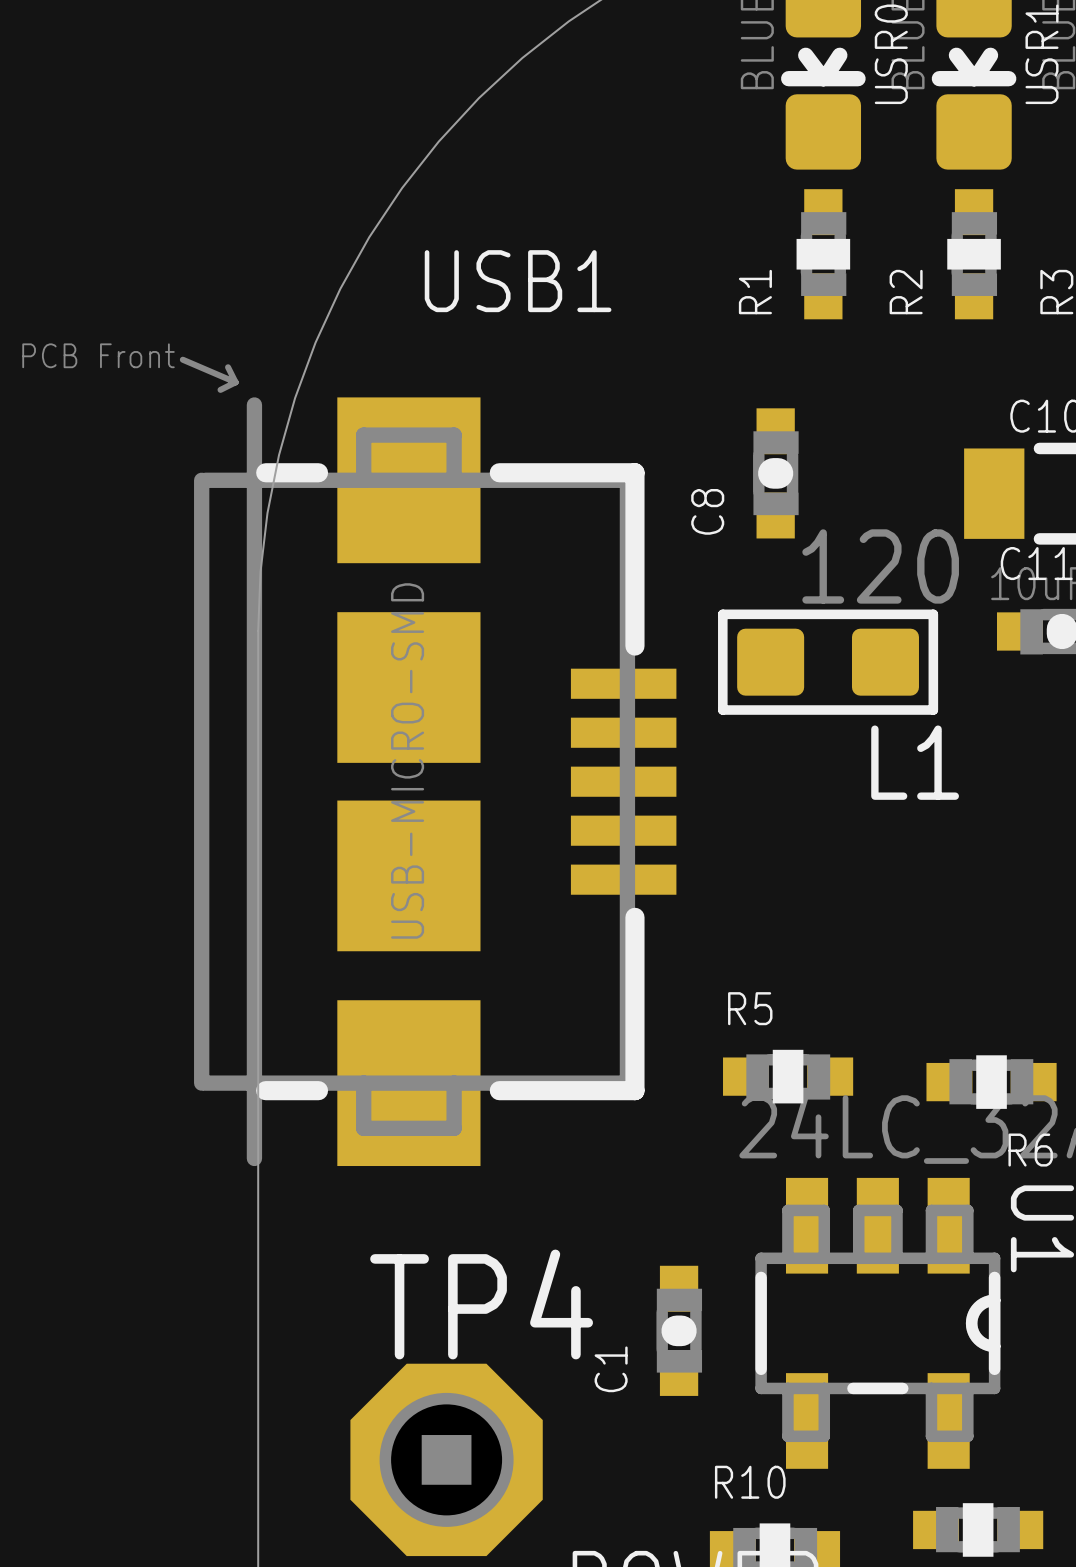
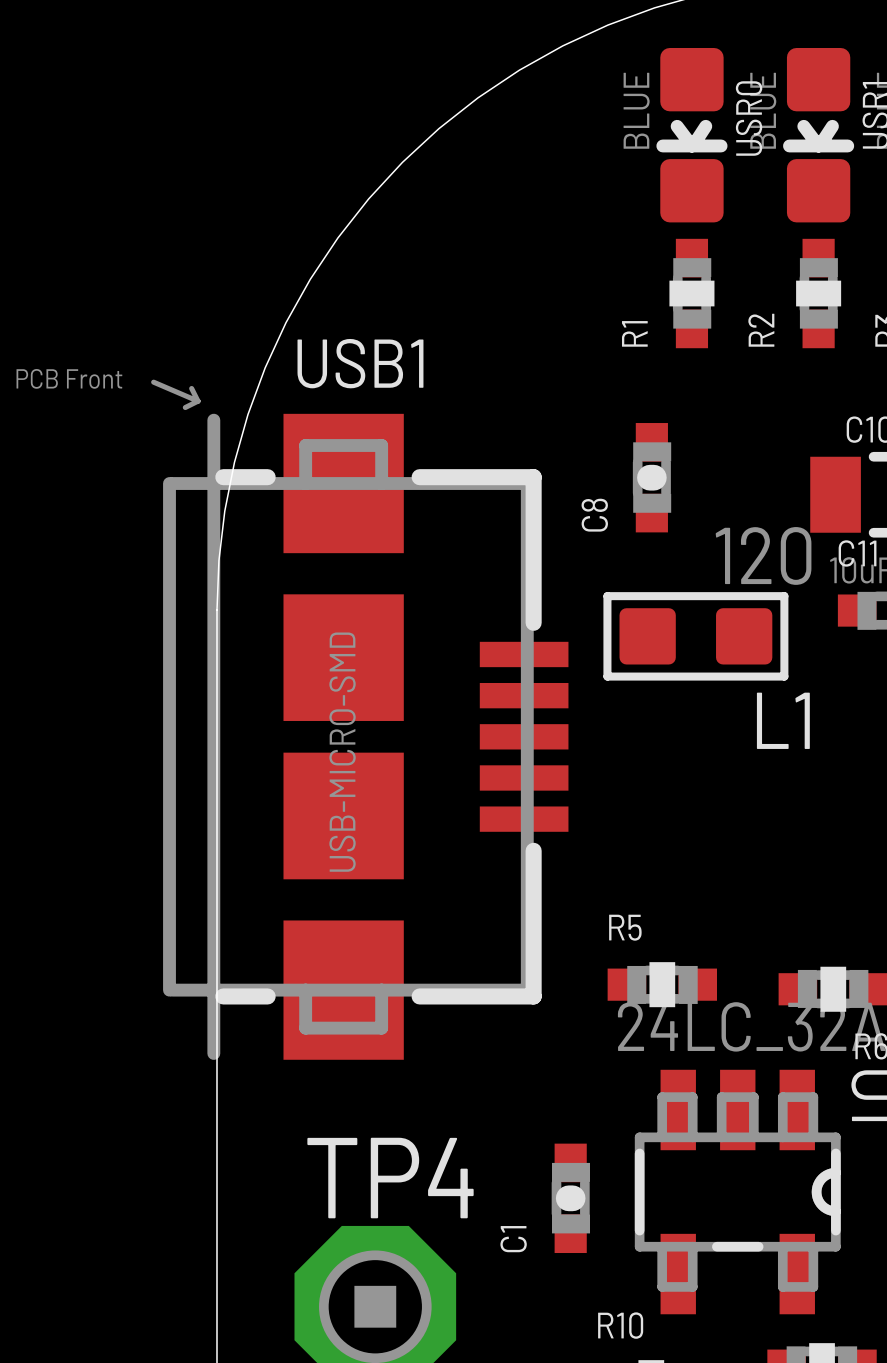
USB1 name position: USB1 (518, 281) -> USB1 (360, 363)

